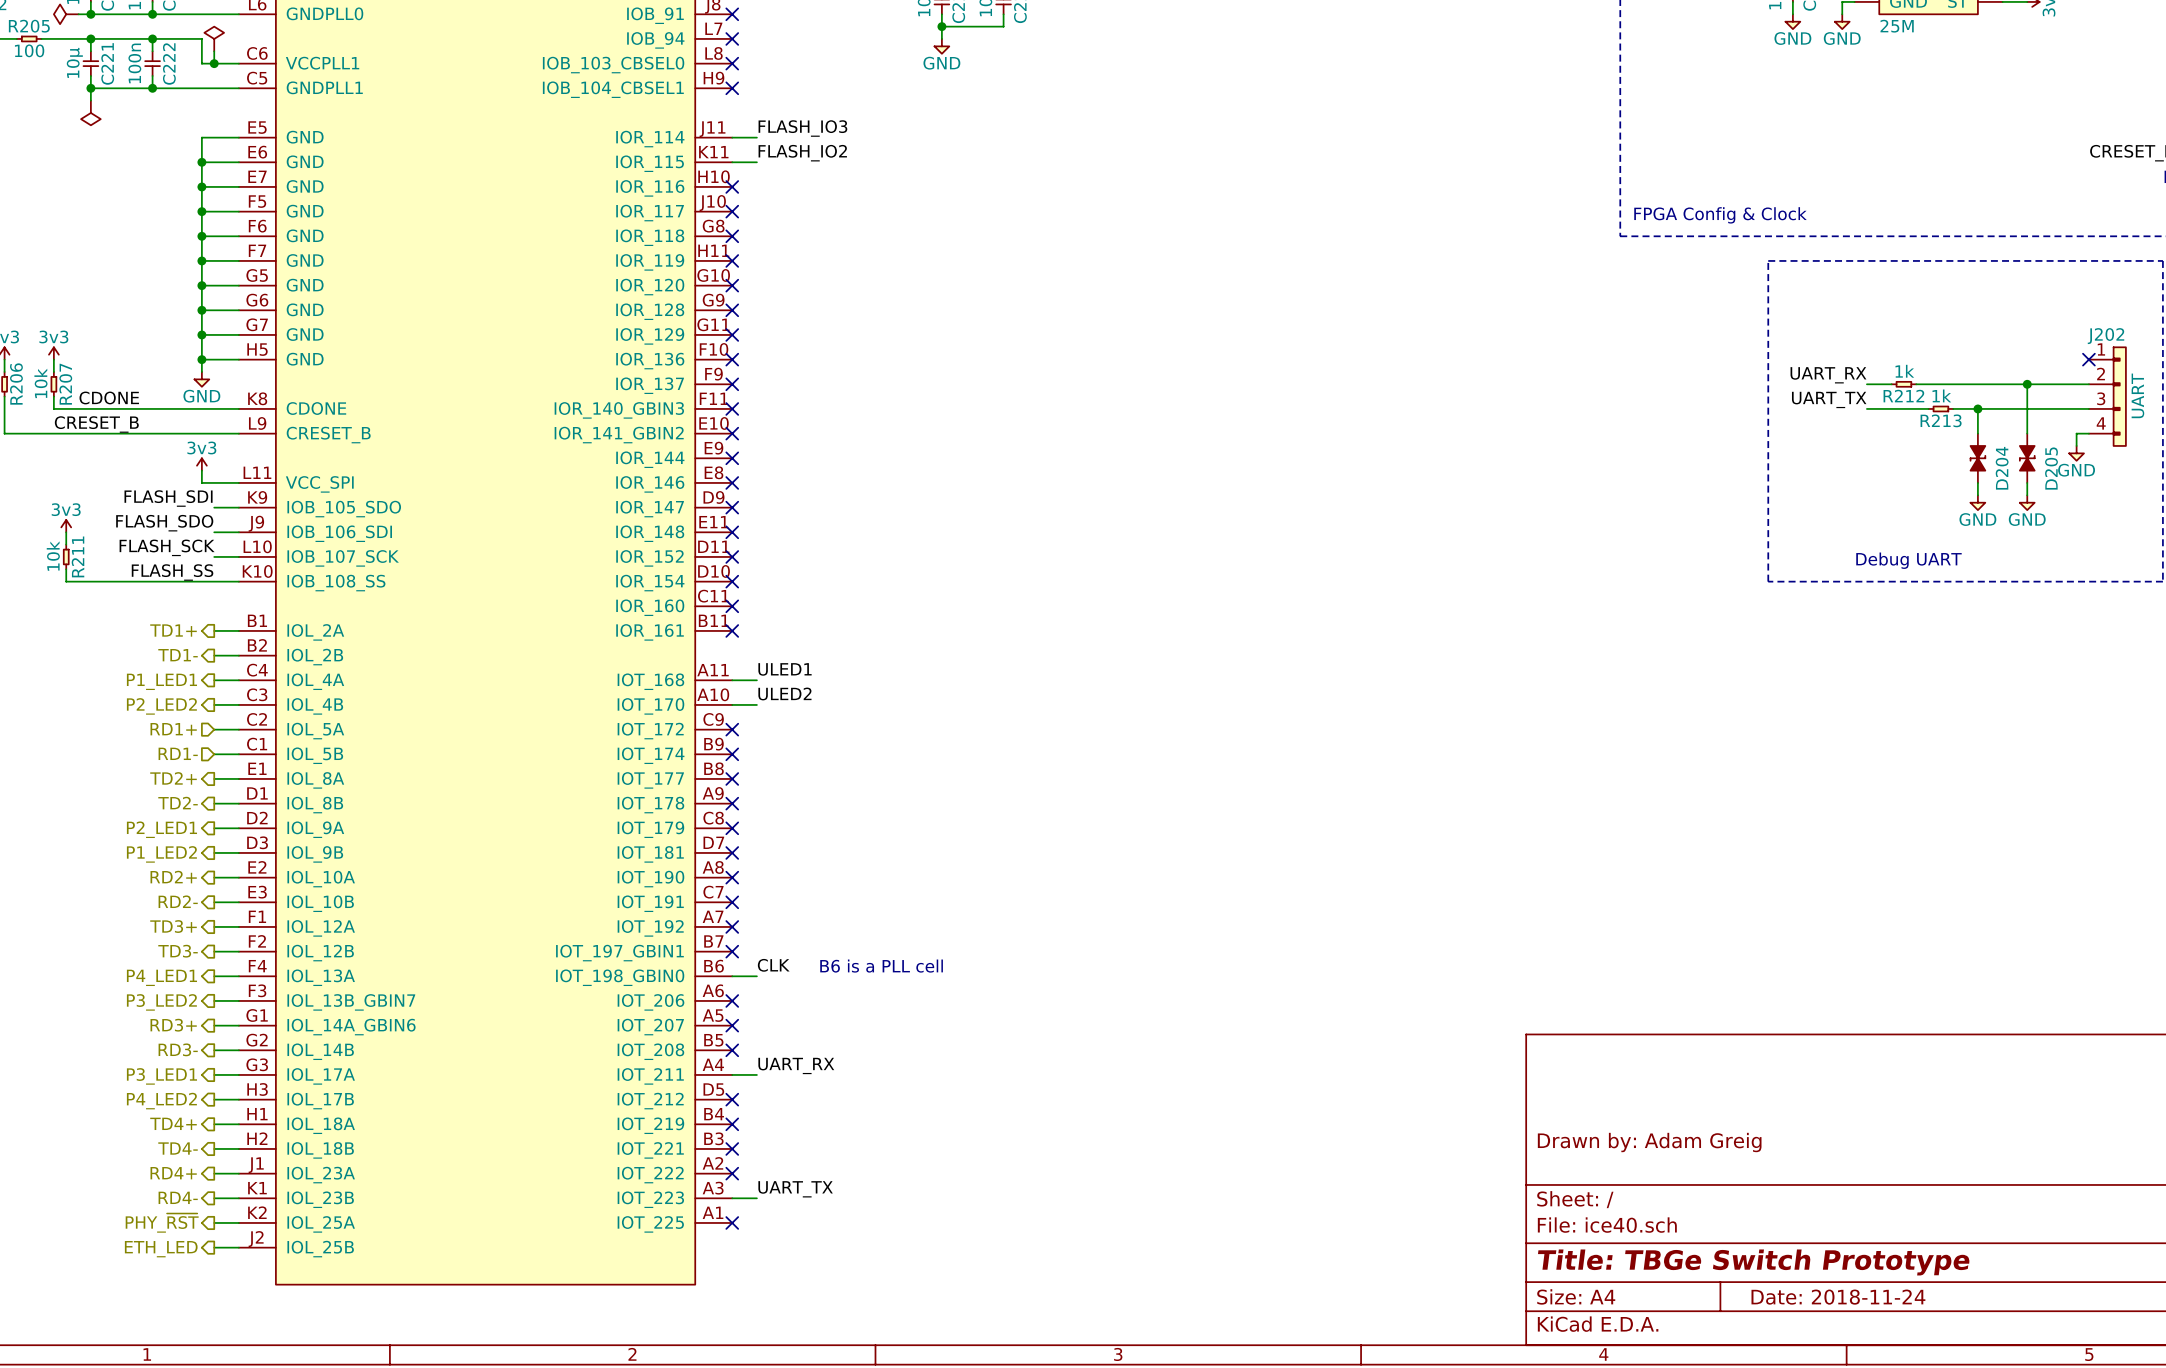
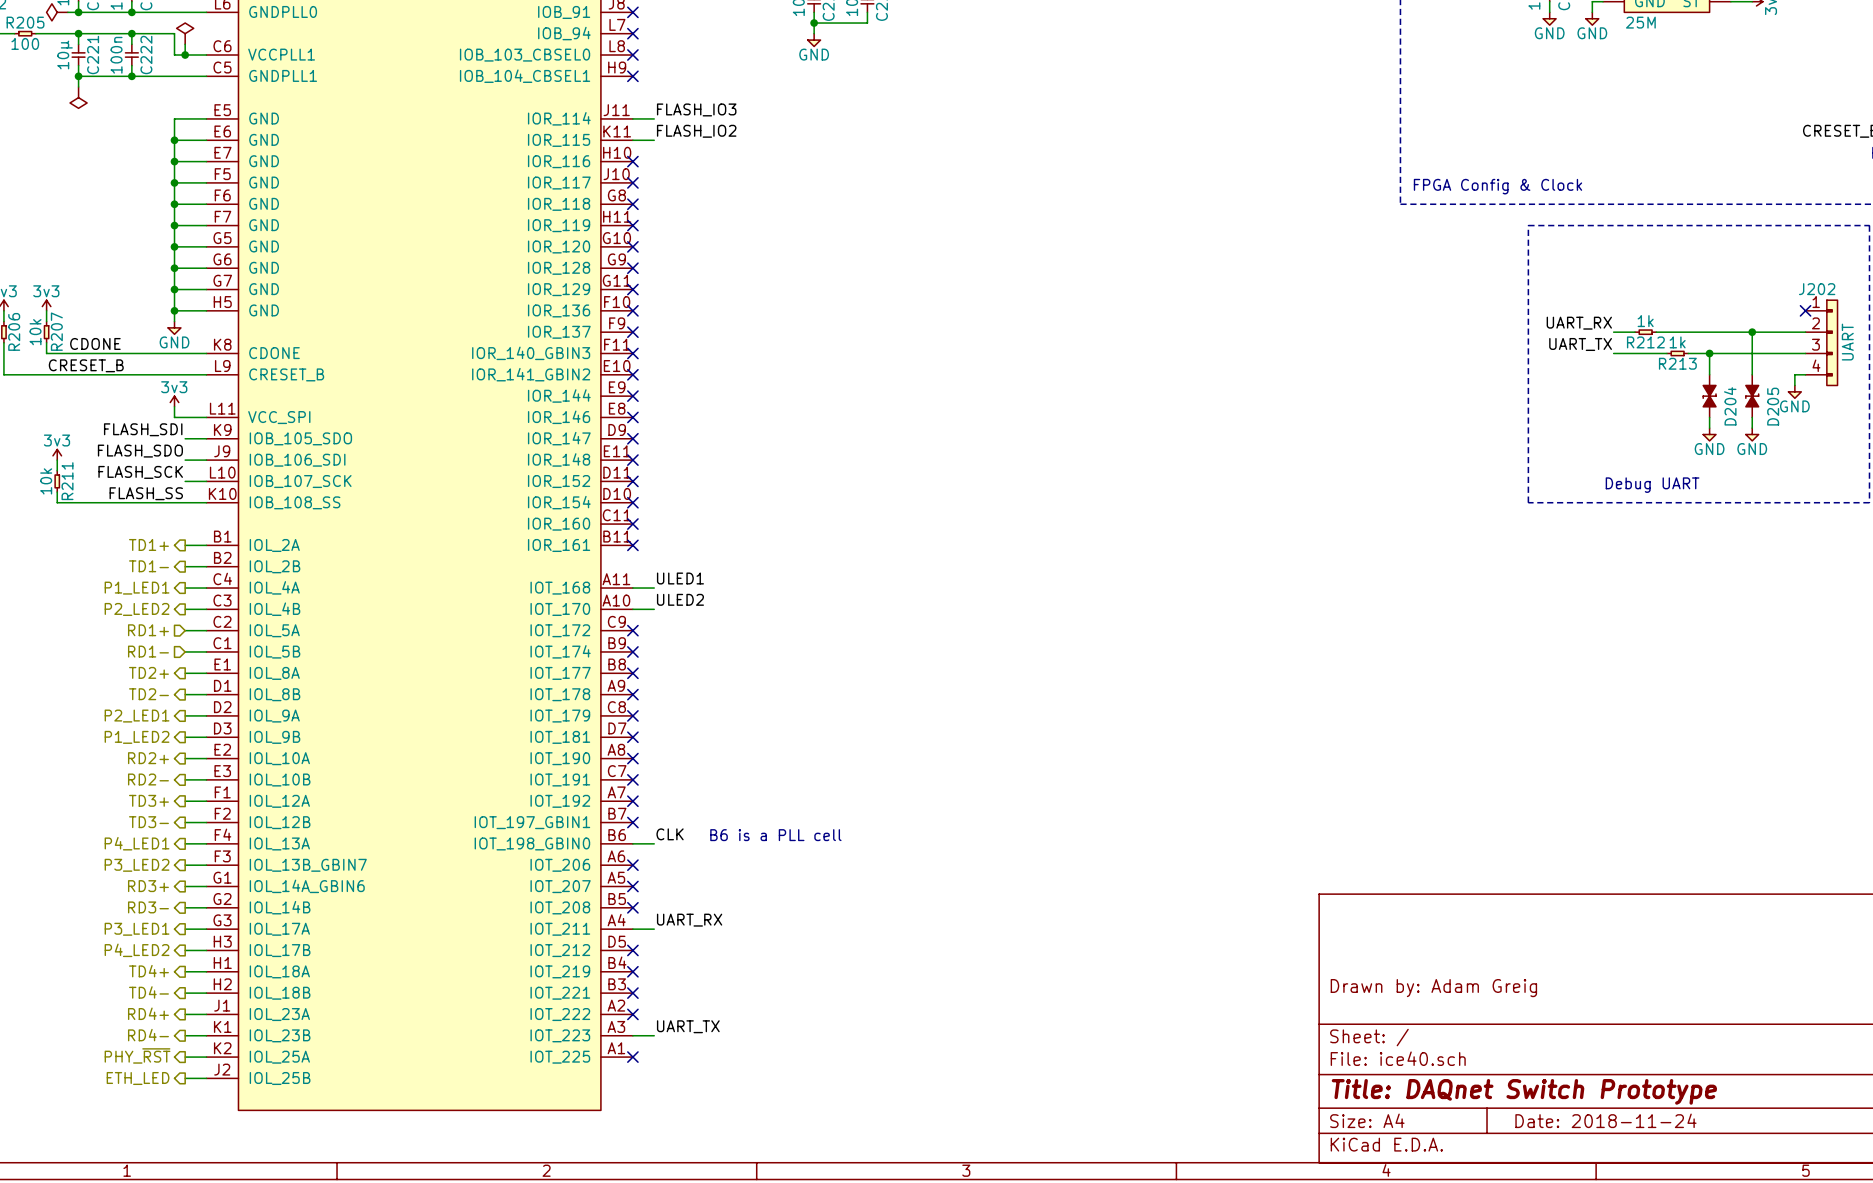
title block: Title: TBGe Switch Prototype (1753, 1262) -> Title: DAQnet Switch Prototype (1524, 1091)

